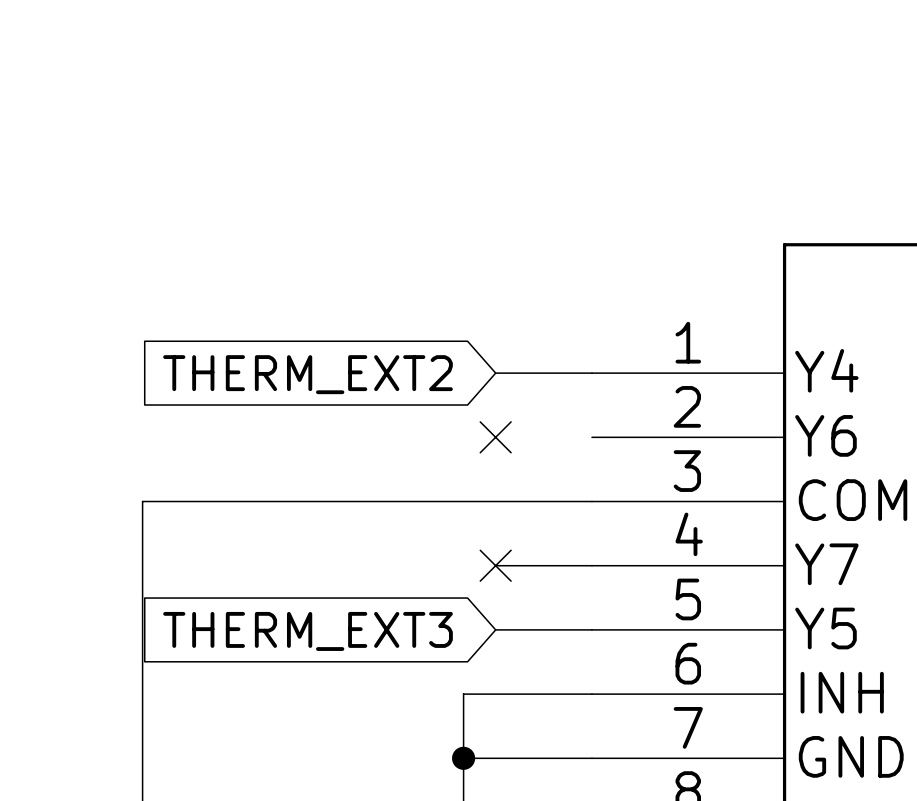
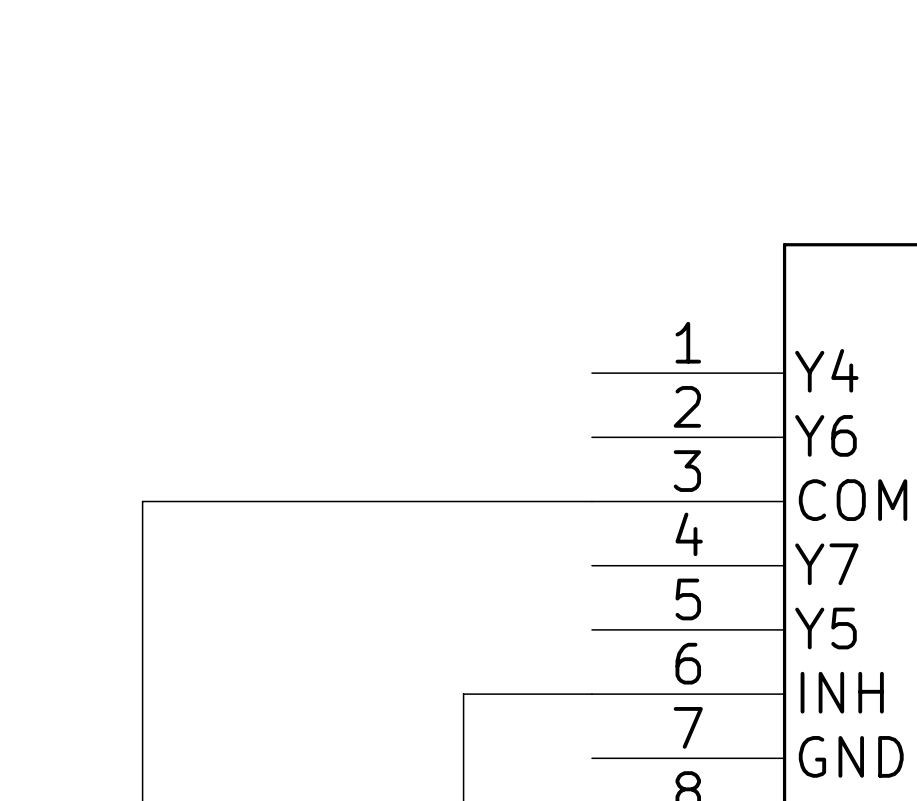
wire: (495, 373) (591, 373) -> none
global label: THERM_EXT2 (308, 374) -> none
no-connect mark: (495, 437) -> none
wire: (495, 565) (591, 565) -> none
no-connect mark: (495, 565) -> none
wire: (495, 629) (591, 629) -> none
global label: THERM_EXT3 (308, 631) -> none
wire: (463, 758) (591, 758) -> none
junction: (463, 758) -> none

